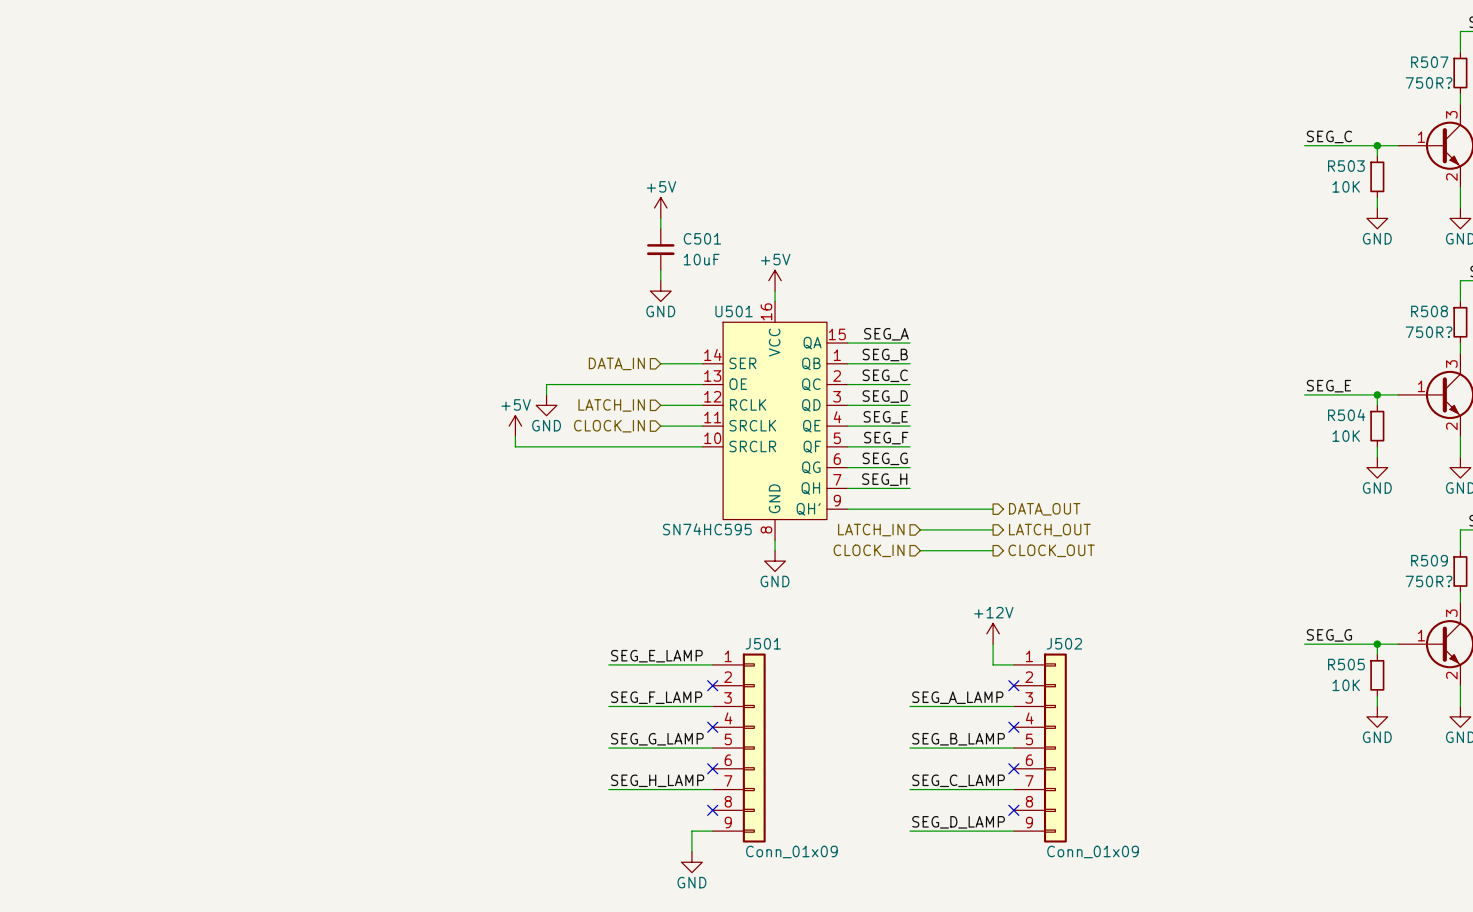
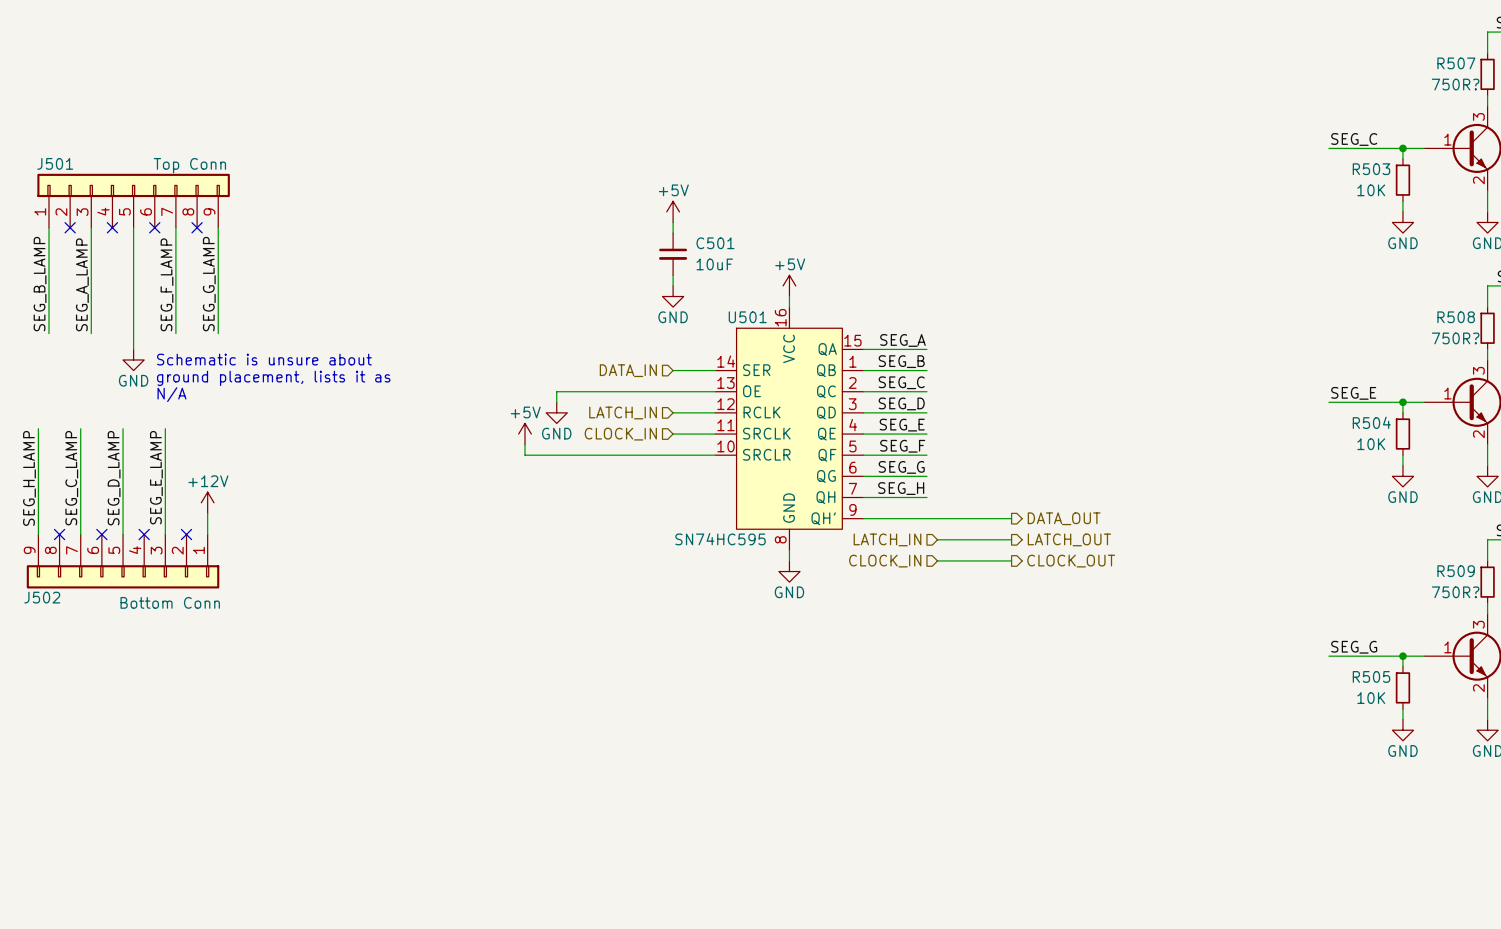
wire: none -> (48, 227) (48, 333)
no-connect mark: none -> (70, 227)
wire: none -> (91, 227) (91, 333)
no-connect mark: none -> (112, 227)
wire: none -> (133, 227) (133, 349)
no-connect mark: none -> (154, 227)
wire: none -> (175, 227) (175, 333)
no-connect mark: none -> (197, 227)
wire: none -> (218, 227) (218, 333)
label: none -> SEG_B_LAMP (40, 284)
label: none -> SEG_G_LAMP (209, 284)
label: none -> SEG_A_LAMP (82, 284)
label: none -> SEG_F_LAMP (166, 284)
text: none -> Schematic is unsure about (264, 359)
power symbol: none -> GND (133, 359)
text: none -> ground placement, lists it as (273, 378)
text: none -> N/A (171, 394)
wire: none -> (38, 428) (38, 534)
wire: none -> (80, 428) (80, 534)
wire: none -> (123, 428) (123, 534)
wire: none -> (165, 428) (165, 534)
label: none -> SEG_E_LAMP (156, 477)
label: none -> SEG_H_LAMP (29, 478)
label: none -> SEG_C_LAMP (71, 478)
label: none -> SEG_D_LAMP (114, 478)
power symbol: none -> +12V (207, 502)
wire: none -> (207, 513) (207, 534)
no-connect mark: none -> (59, 534)
no-connect mark: none -> (101, 534)
no-connect mark: none -> (144, 534)
no-connect mark: none -> (186, 534)
power symbol: +12V (993, 633) -> none
J501 name position: J501 (763, 643) -> J501 (55, 163)
J502 name position: J502 (1064, 643) -> J502 (42, 597)
wire: (993, 644) (993, 664) (1013, 664) -> none
label: SEG_E_LAMP (656, 656) -> none
wire: (608, 664) (712, 664) -> none
no-connect mark: (712, 685) -> none
no-connect mark: (1013, 685) -> none
label: SEG_F_LAMP (656, 697) -> none
label: SEG_A_LAMP (957, 697) -> none
wire: (608, 706) (712, 706) -> none
wire: (910, 706) (1013, 706) -> none
no-connect mark: (712, 727) -> none
no-connect mark: (1013, 727) -> none
label: SEG_G_LAMP (657, 739) -> none
label: SEG_B_LAMP (958, 739) -> none
wire: (608, 748) (712, 748) -> none
J501 position: (739, 748) -> (133, 200)
J501 rotation: 0° (754, 748) -> 90° counterclockwise (133, 185)
wire: (910, 748) (1013, 748) -> none
J502 position: (1040, 748) -> (123, 561)
J502 rotation: 0° (1055, 748) -> 90° clockwise (123, 576)
no-connect mark: (712, 768) -> none
no-connect mark: (1013, 768) -> none
label: SEG_H_LAMP (657, 780) -> none
label: SEG_C_LAMP (958, 780) -> none
wire: (608, 789) (712, 789) -> none
wire: (910, 789) (1013, 789) -> none
no-connect mark: (712, 810) -> none
no-connect mark: (1013, 810) -> none
label: SEG_D_LAMP (958, 822) -> none
wire: (712, 831) (691, 831) (691, 851) -> none
wire: (910, 831) (1013, 831) -> none
J501 value: Conn_01x09 (791, 851) -> Top Conn (189, 165)
J502 value: Conn_01x09 (1093, 851) -> Bottom Conn (170, 602)
power symbol: GND (691, 862) -> none

